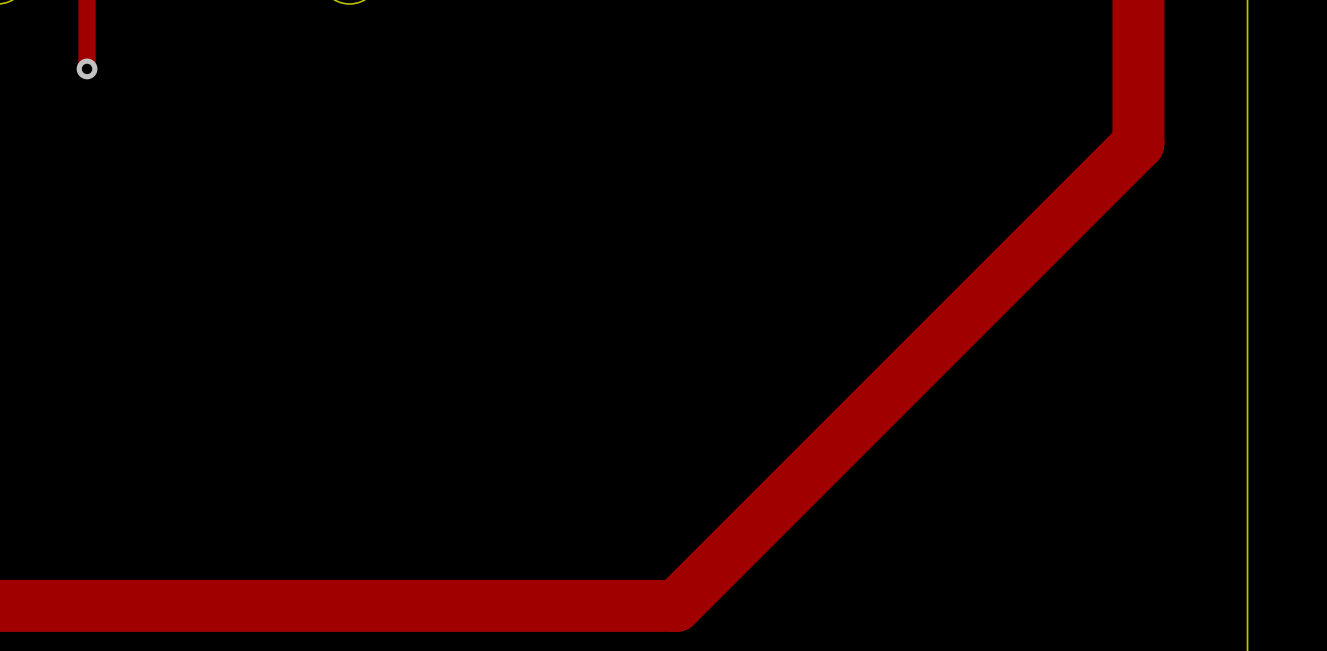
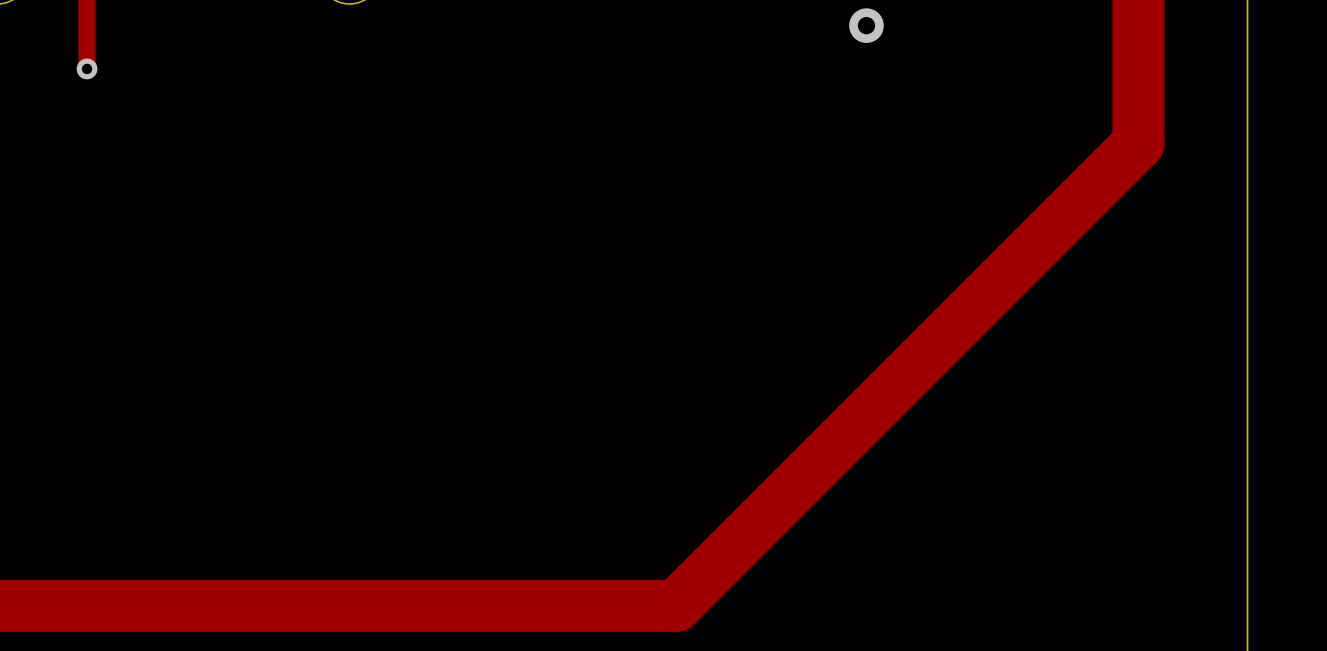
via: none -> (866, 25)

